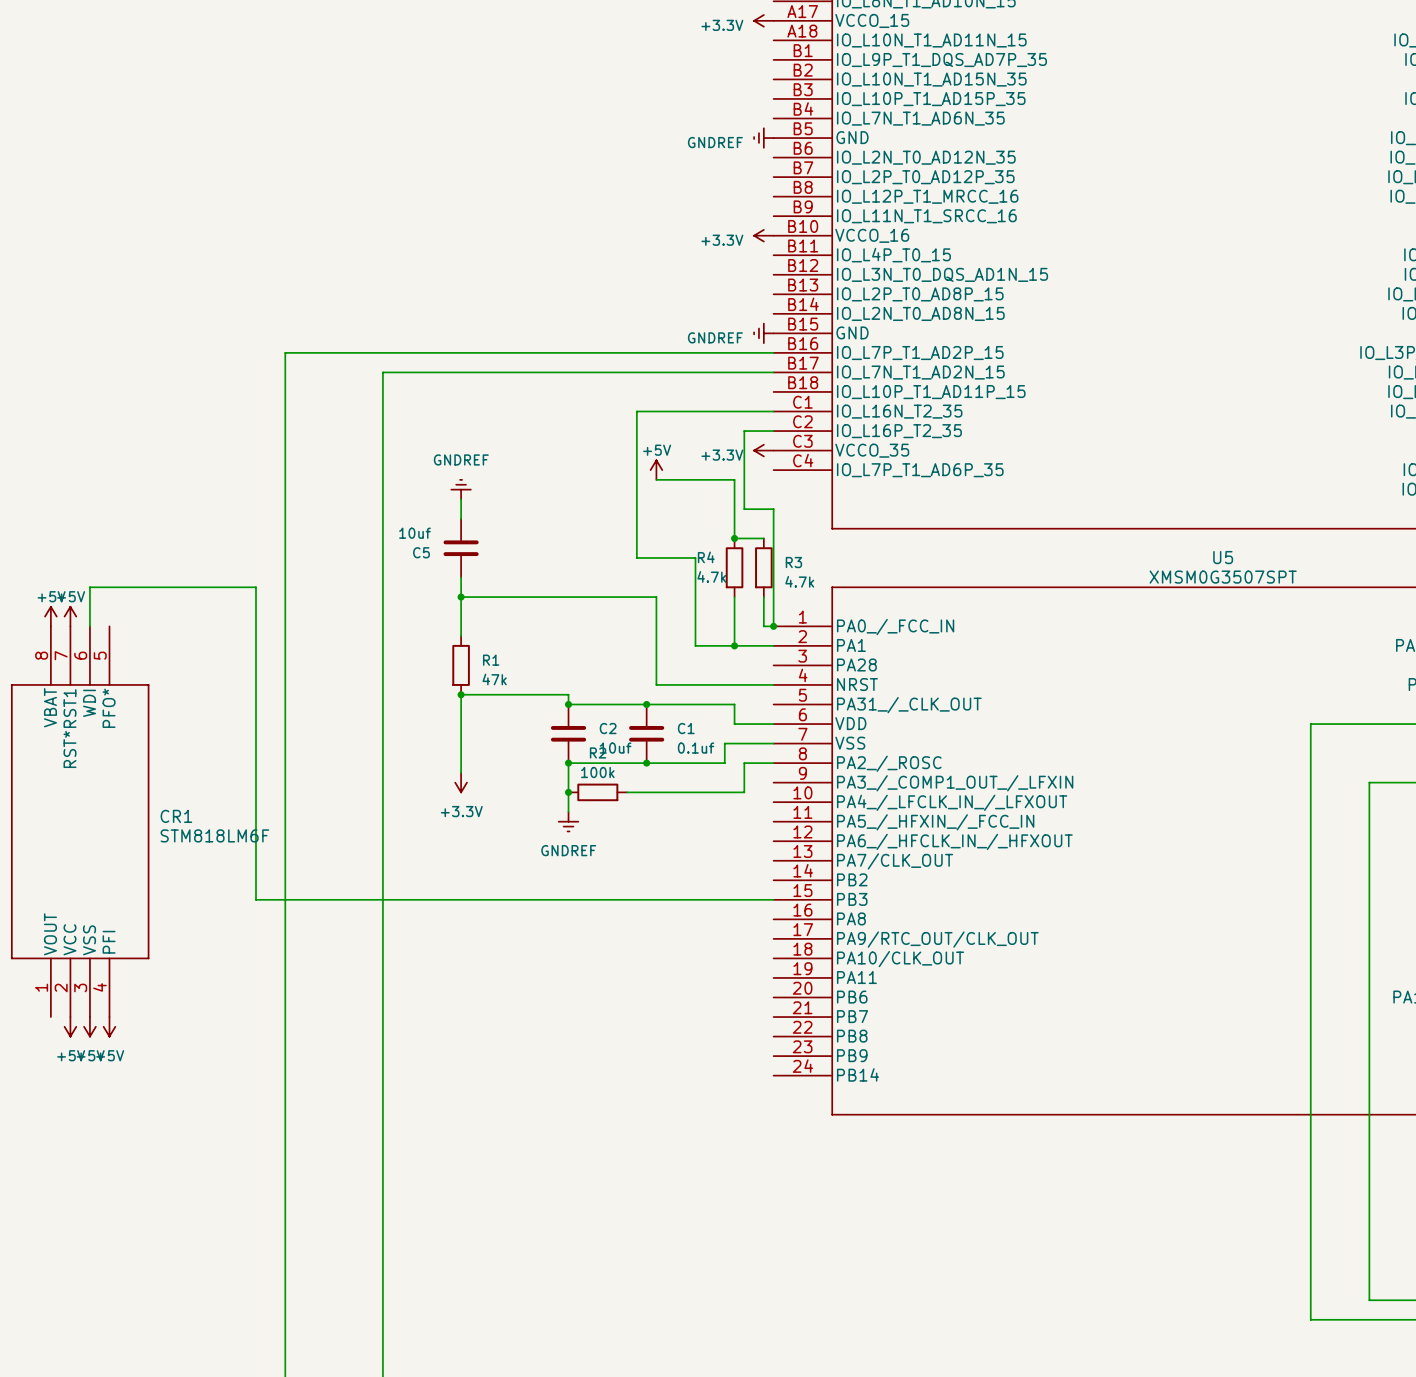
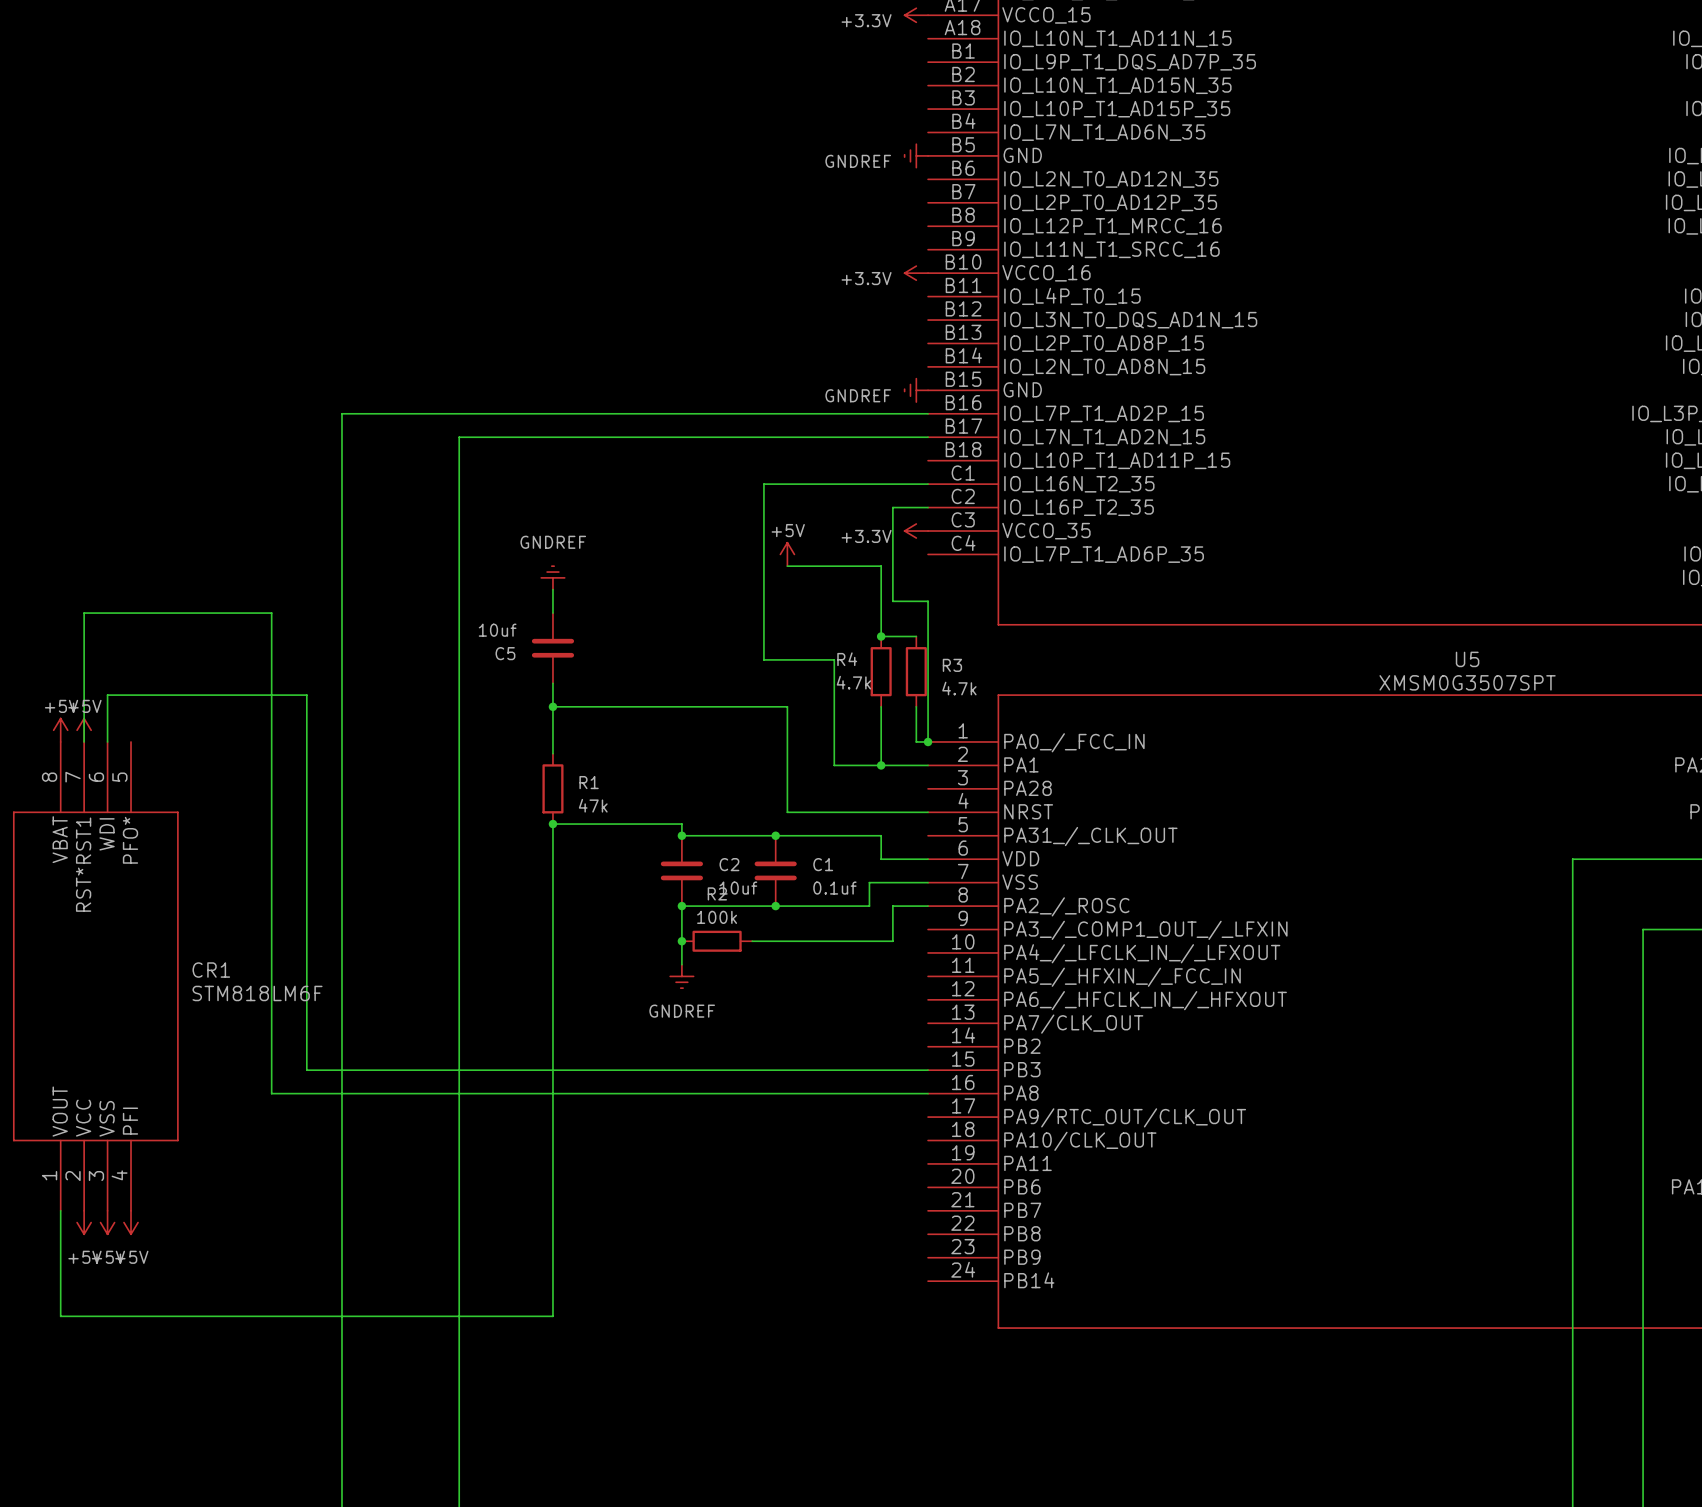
wire: none -> (84, 741) (84, 613) (271, 613) (271, 1093) (928, 1093)
wire: none -> (552, 917) (552, 1316) (60, 1316) (60, 1210)
power symbol: +3.3V (461, 782) -> none

